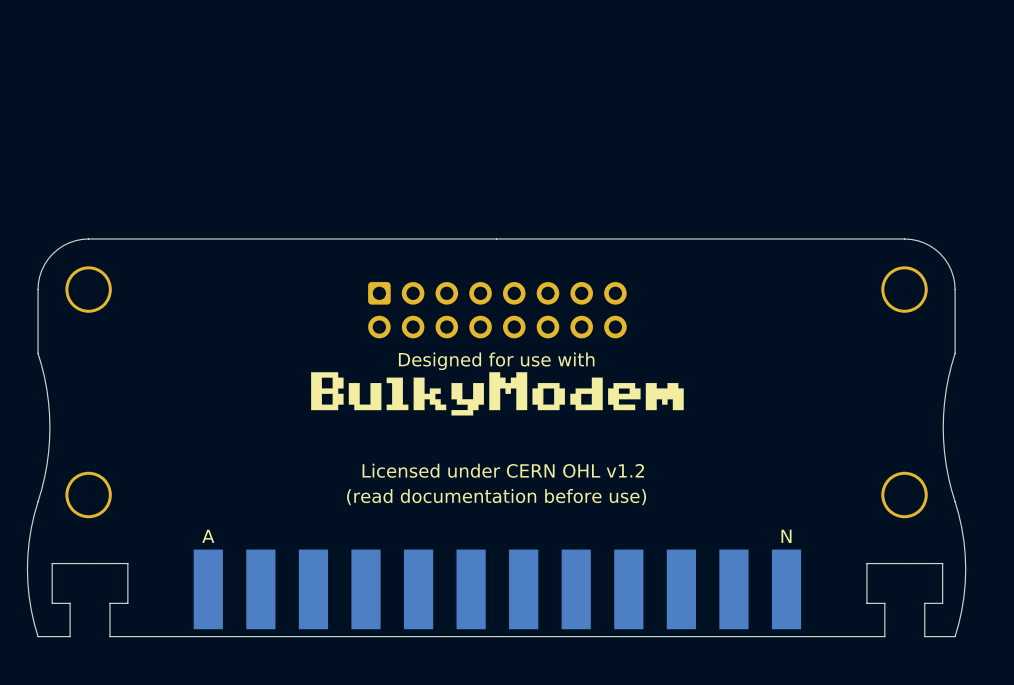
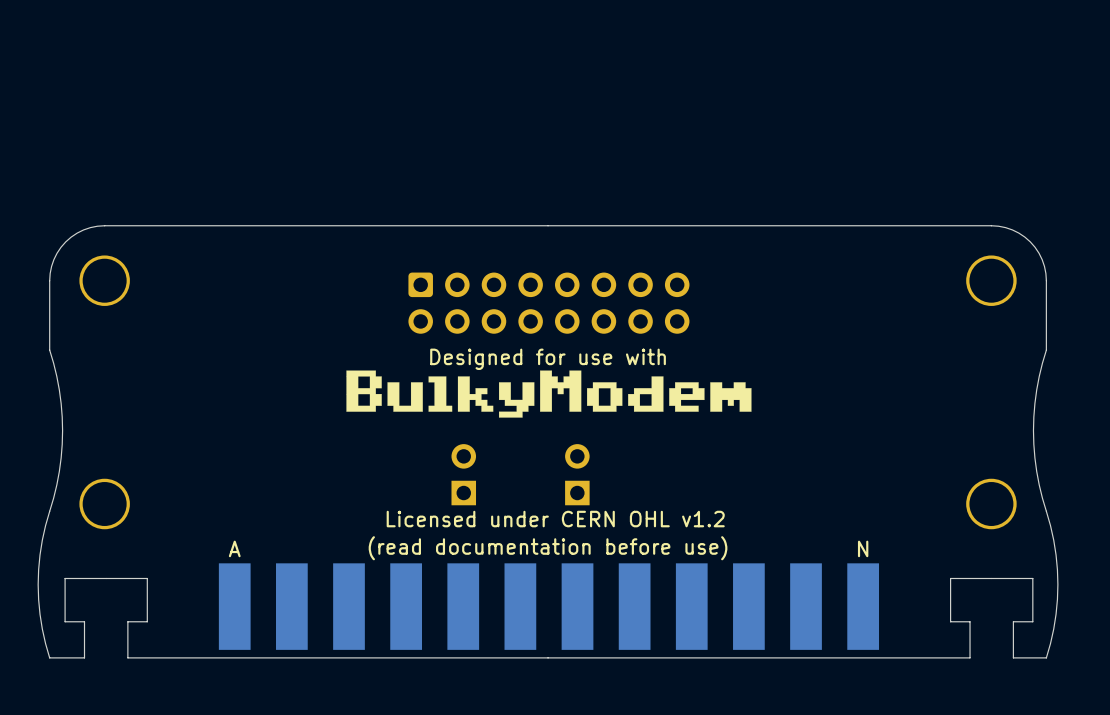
part: none -> (463, 474)
part: none -> (577, 474)
text position: Licensed under CERN OHL v1.2 (503, 470) -> Licensed under CERN OHL v1.2 (555, 519)
text position: (read documentation before use) (496, 497) -> (read documentation before use) (548, 548)

